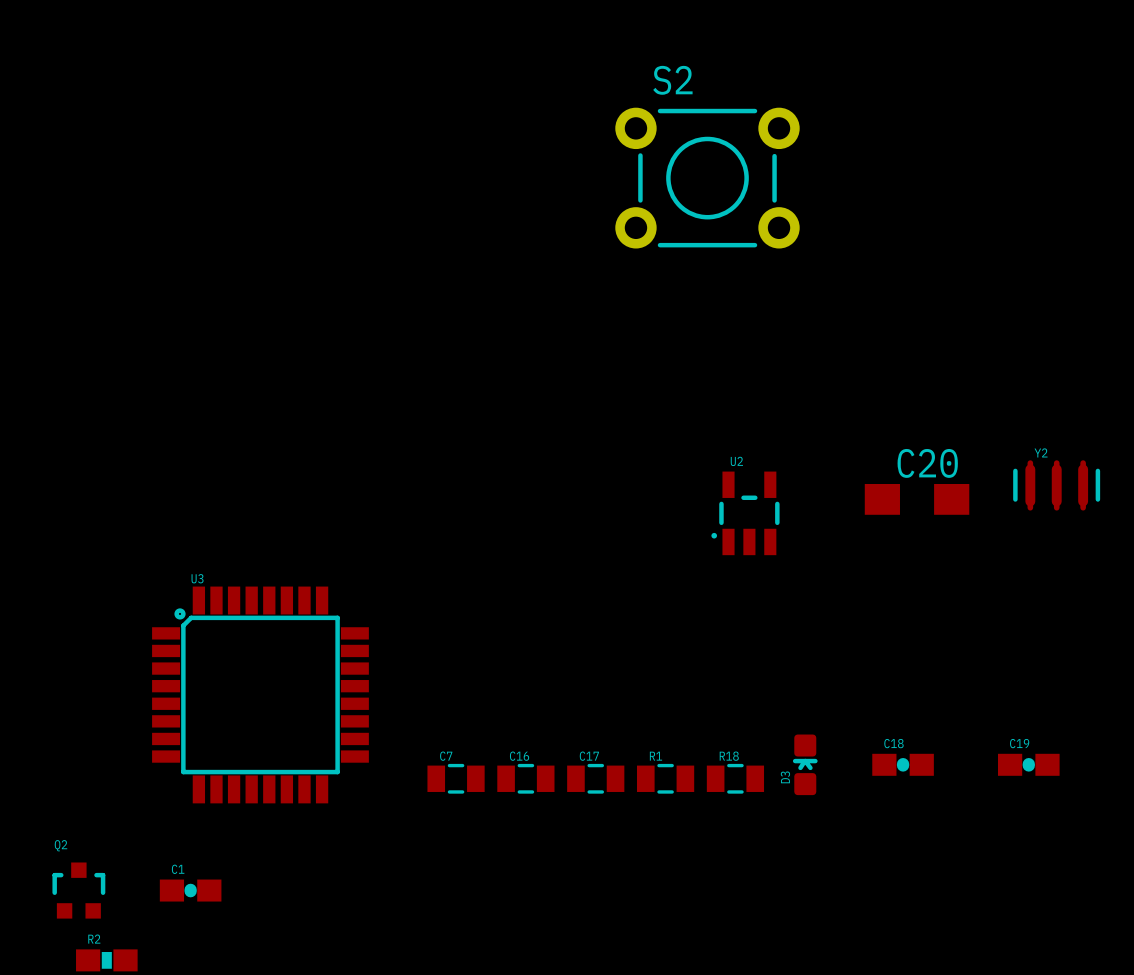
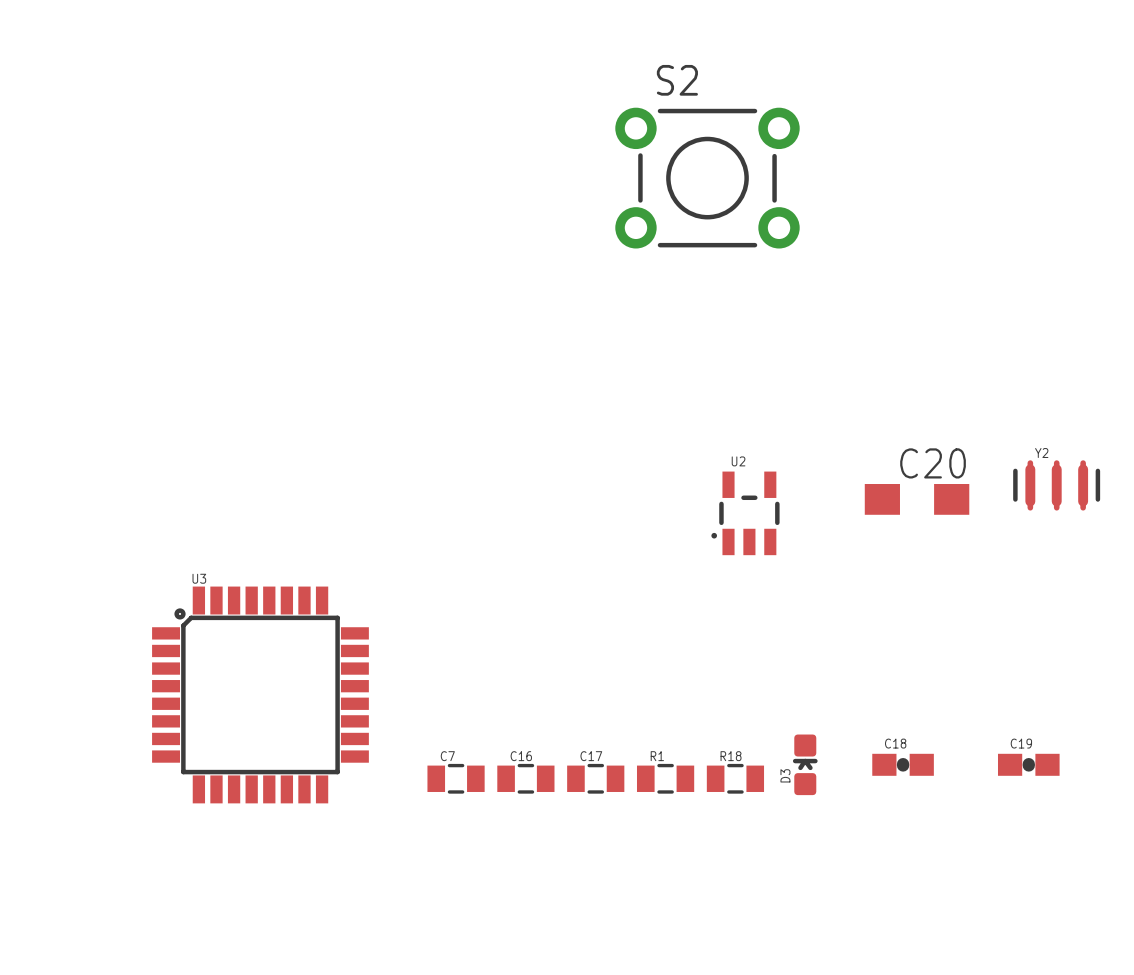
Q2: (78, 890) -> none
C1: (190, 890) -> none
R2: (106, 960) -> none

